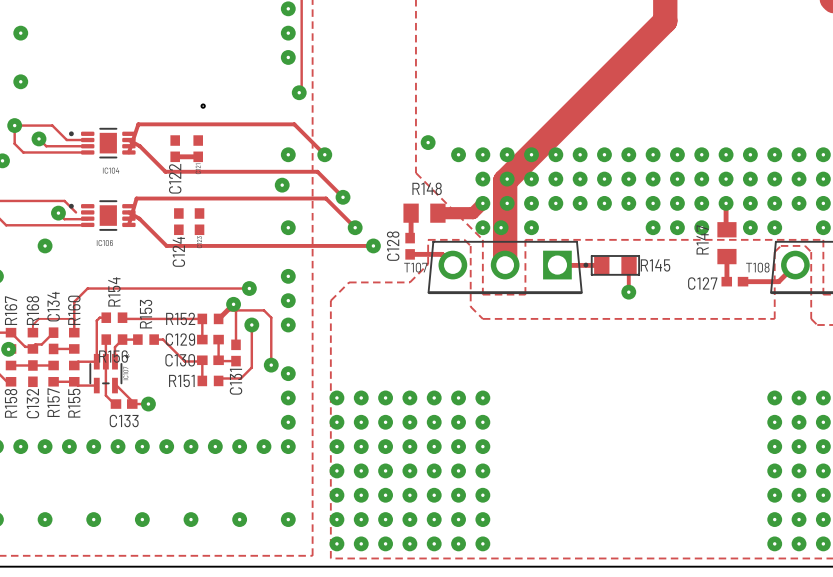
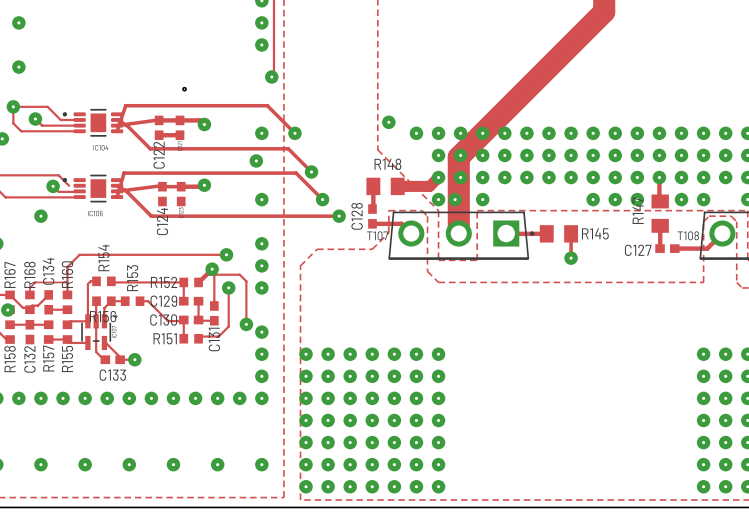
track: none -> (204, 124) (200, 120) (158, 119) (117, 125)
via: none -> (204, 124)
track: none -> (204, 185) (161, 185) (117, 191)
via: none -> (204, 185)
R145 footprint: [591, 255, 640, 276] -> [539, 225, 579, 243]

